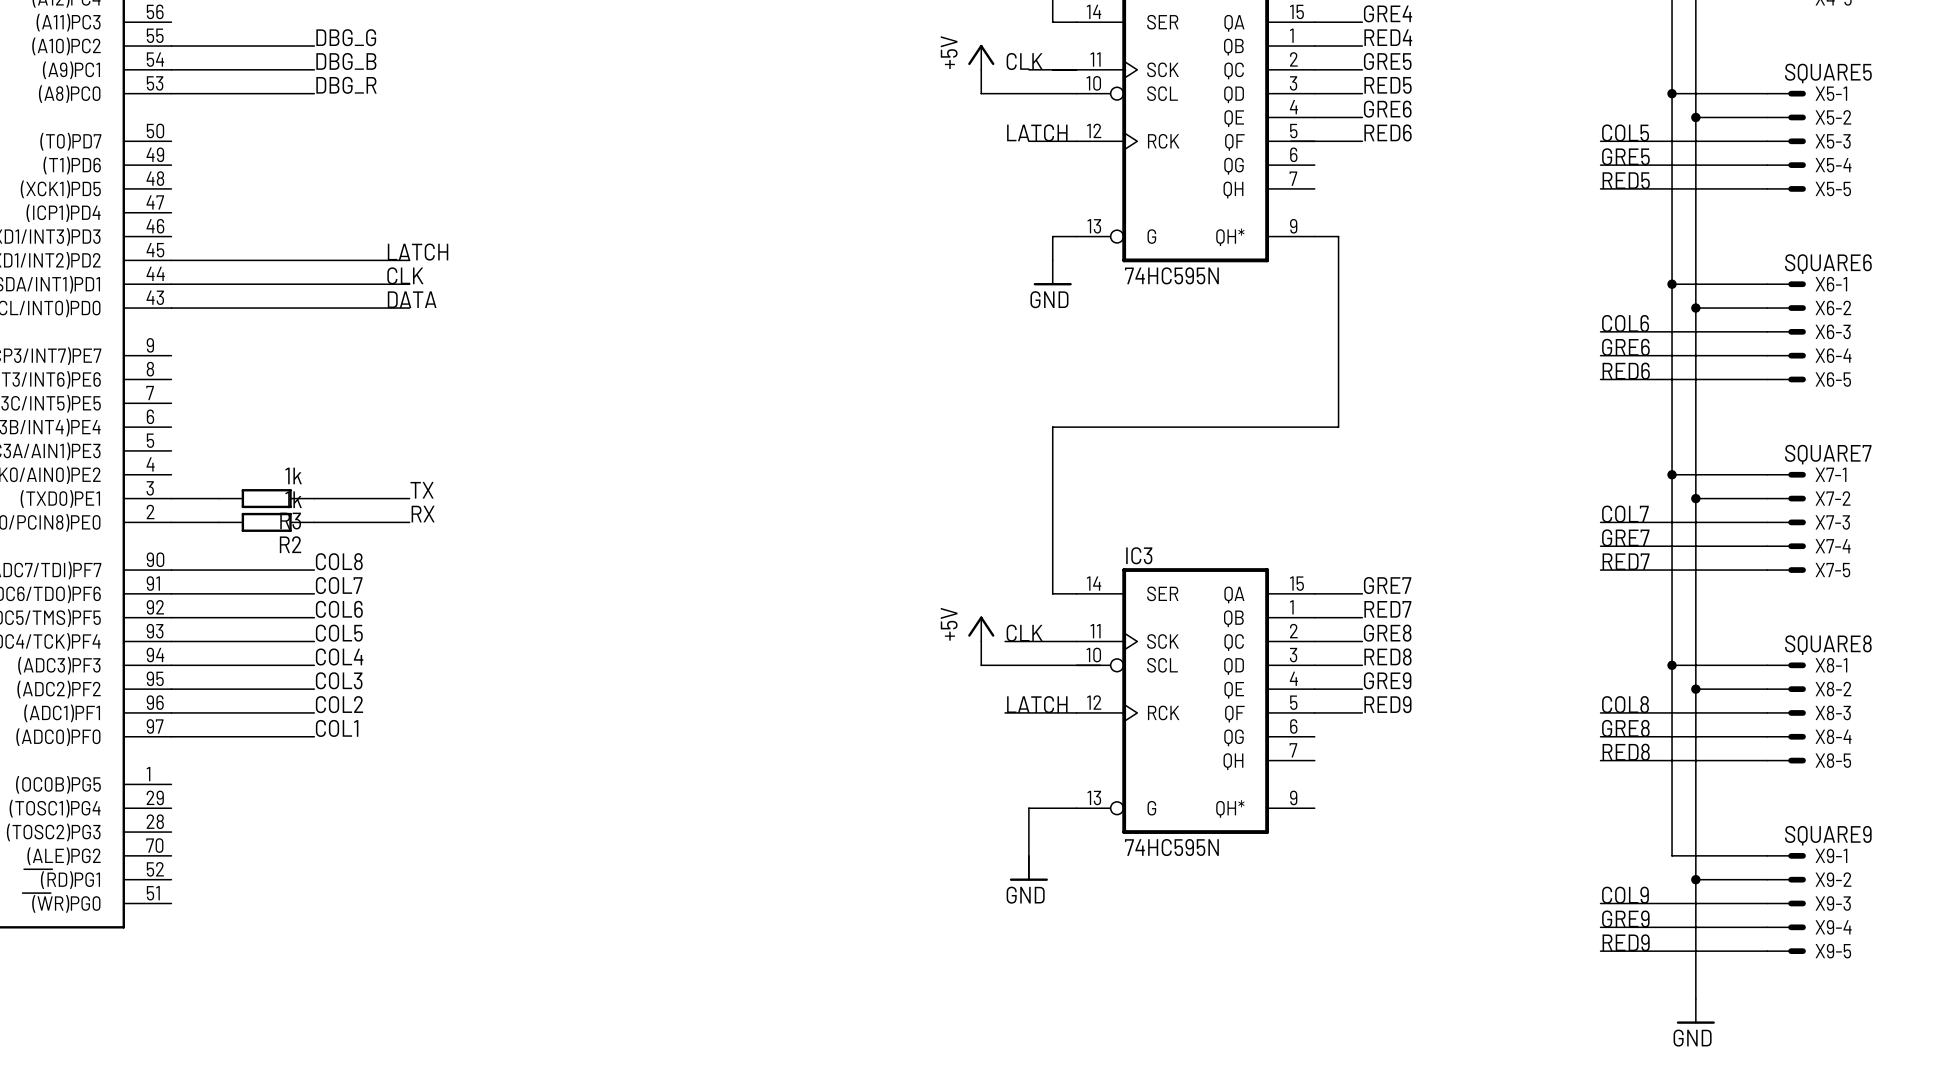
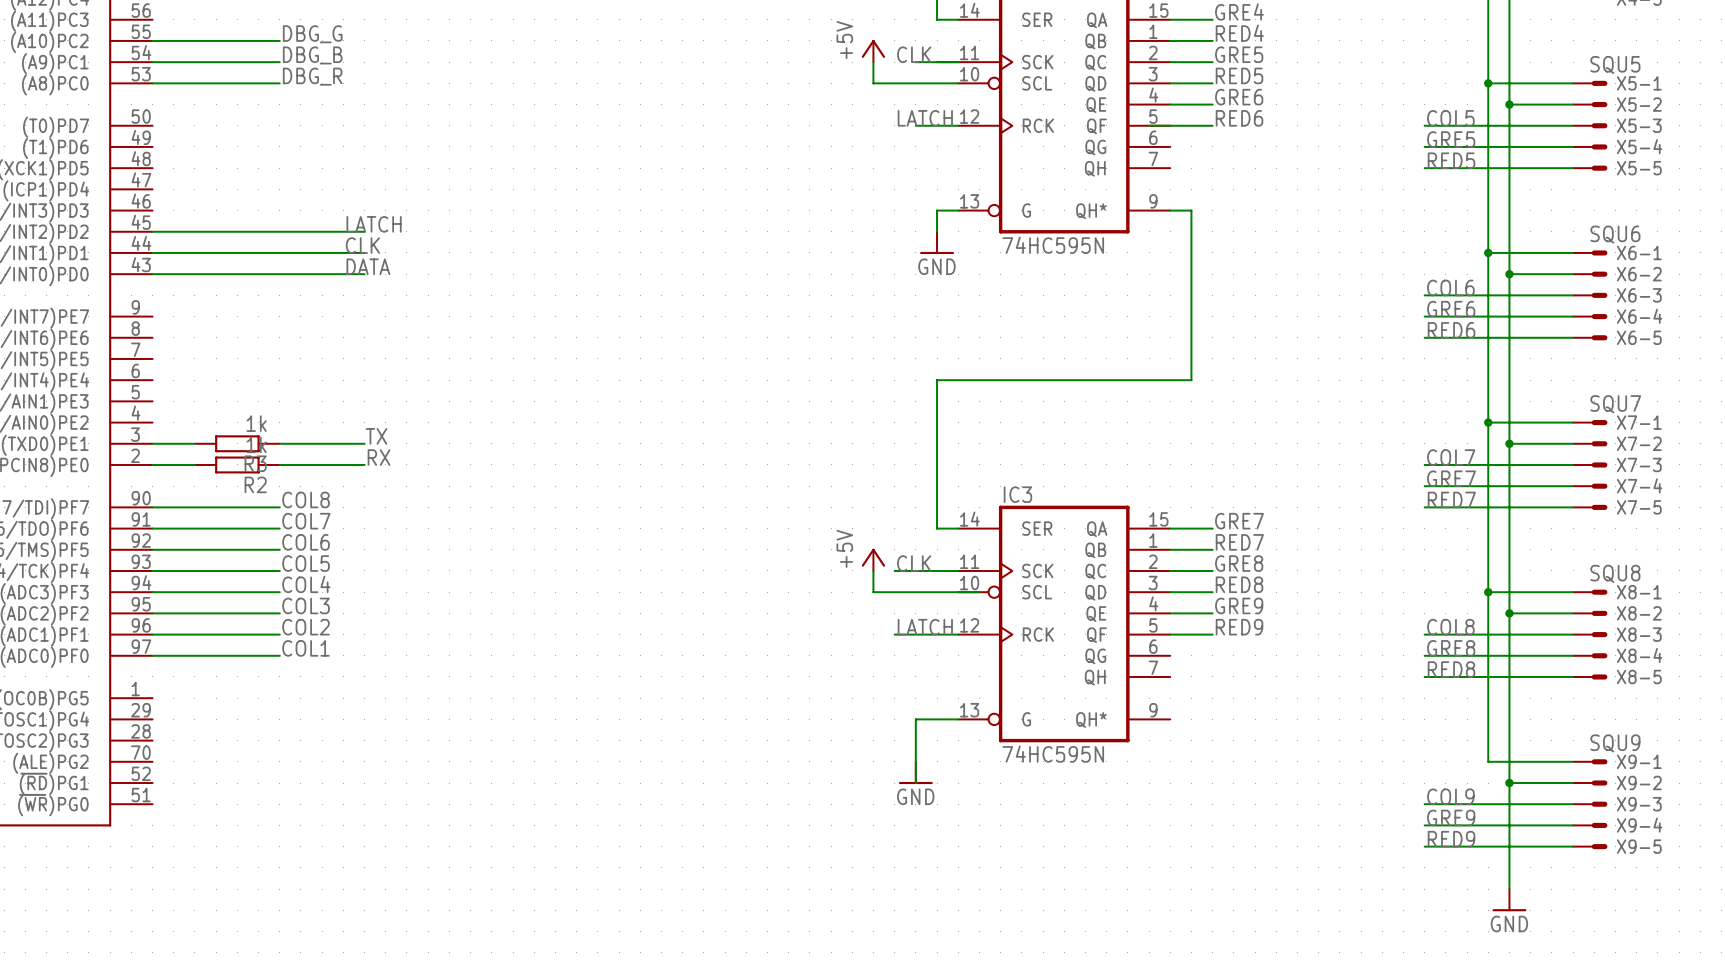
X5-1 value: SQUARE5 (1828, 73) -> SQU5 (1615, 64)
X6-1 value: SQUARE6 (1828, 264) -> SQU6 (1615, 234)
X7-1 value: SQUARE7 (1828, 454) -> SQU7 (1615, 404)
X8-1 value: SQUARE8 (1828, 645) -> SQU8 (1615, 573)
X9-1 value: SQUARE9 (1828, 835) -> SQU9 (1615, 743)

